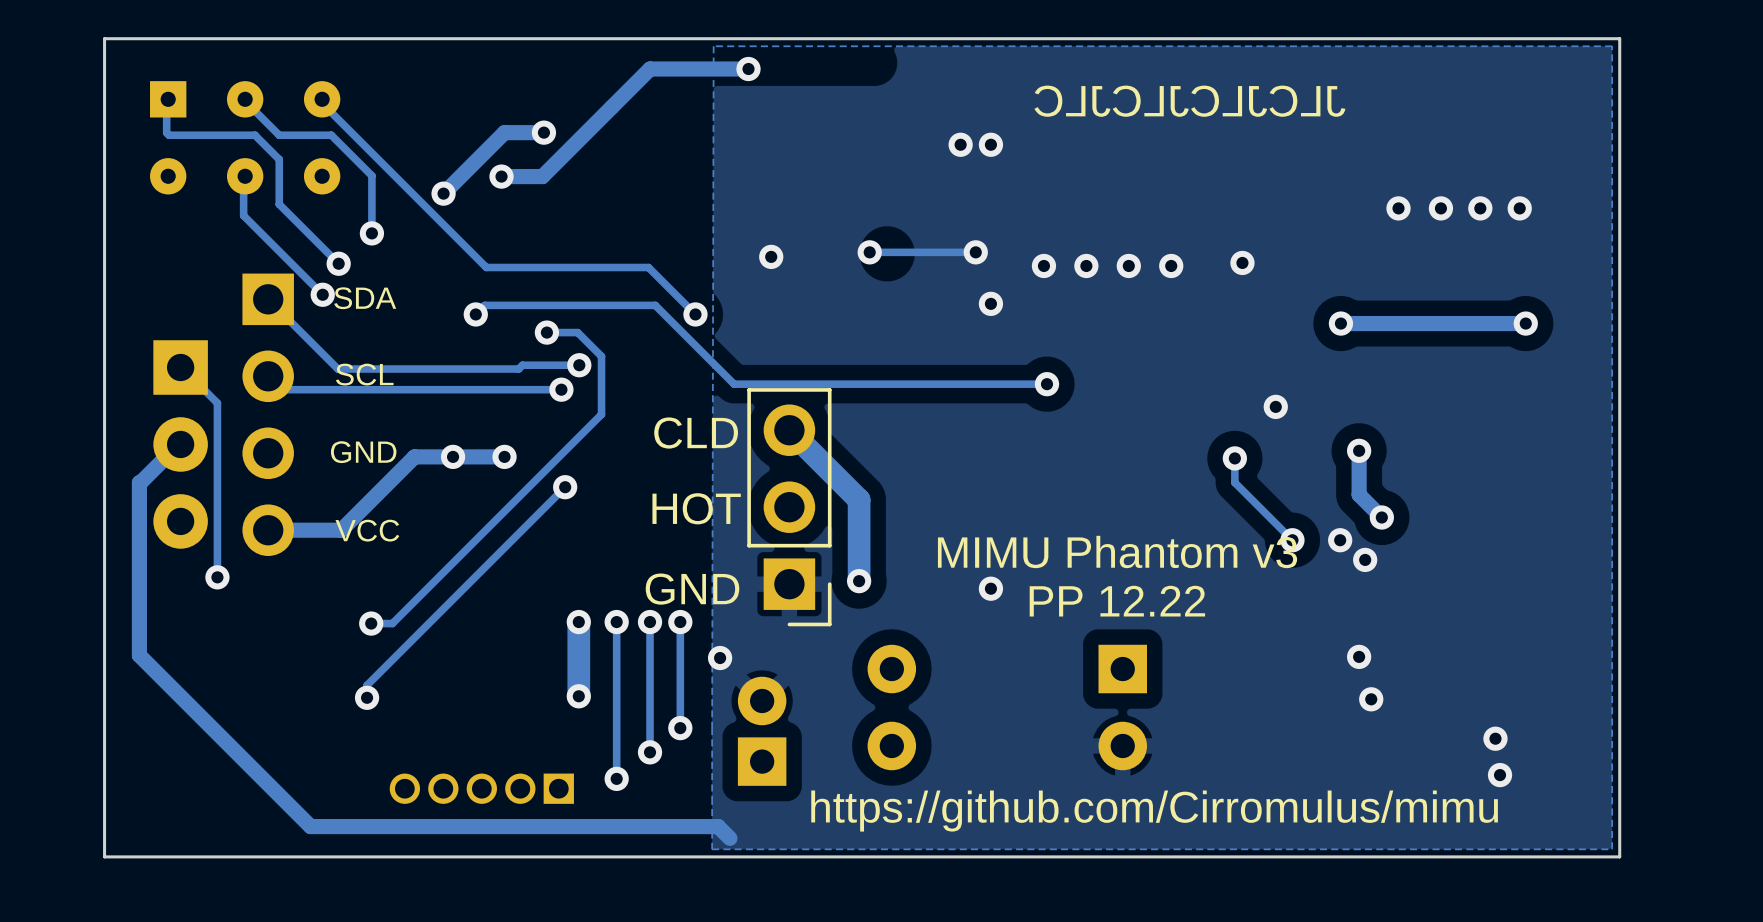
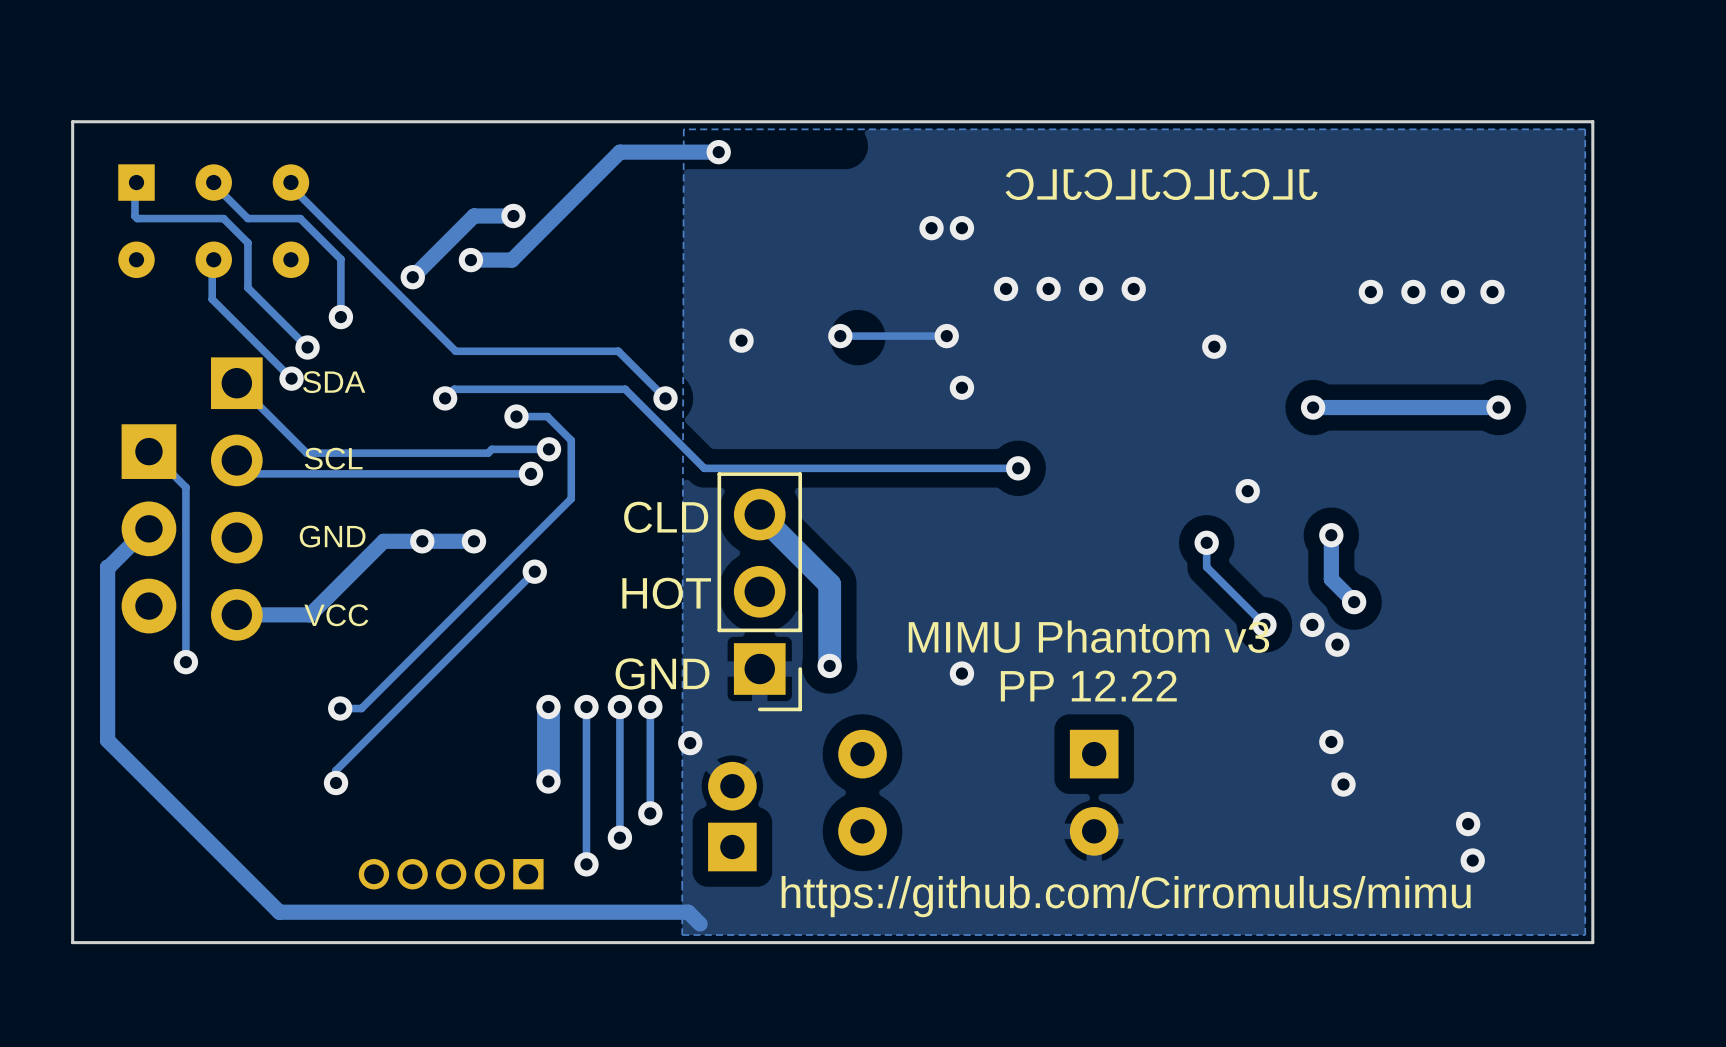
via: none -> (1006, 288)
via: none -> (1048, 288)
via: none -> (1091, 288)
via: none -> (1133, 288)
via: (1043, 265) -> none
via: (1086, 265) -> none
via: (1128, 265) -> none
via: (1171, 265) -> none

